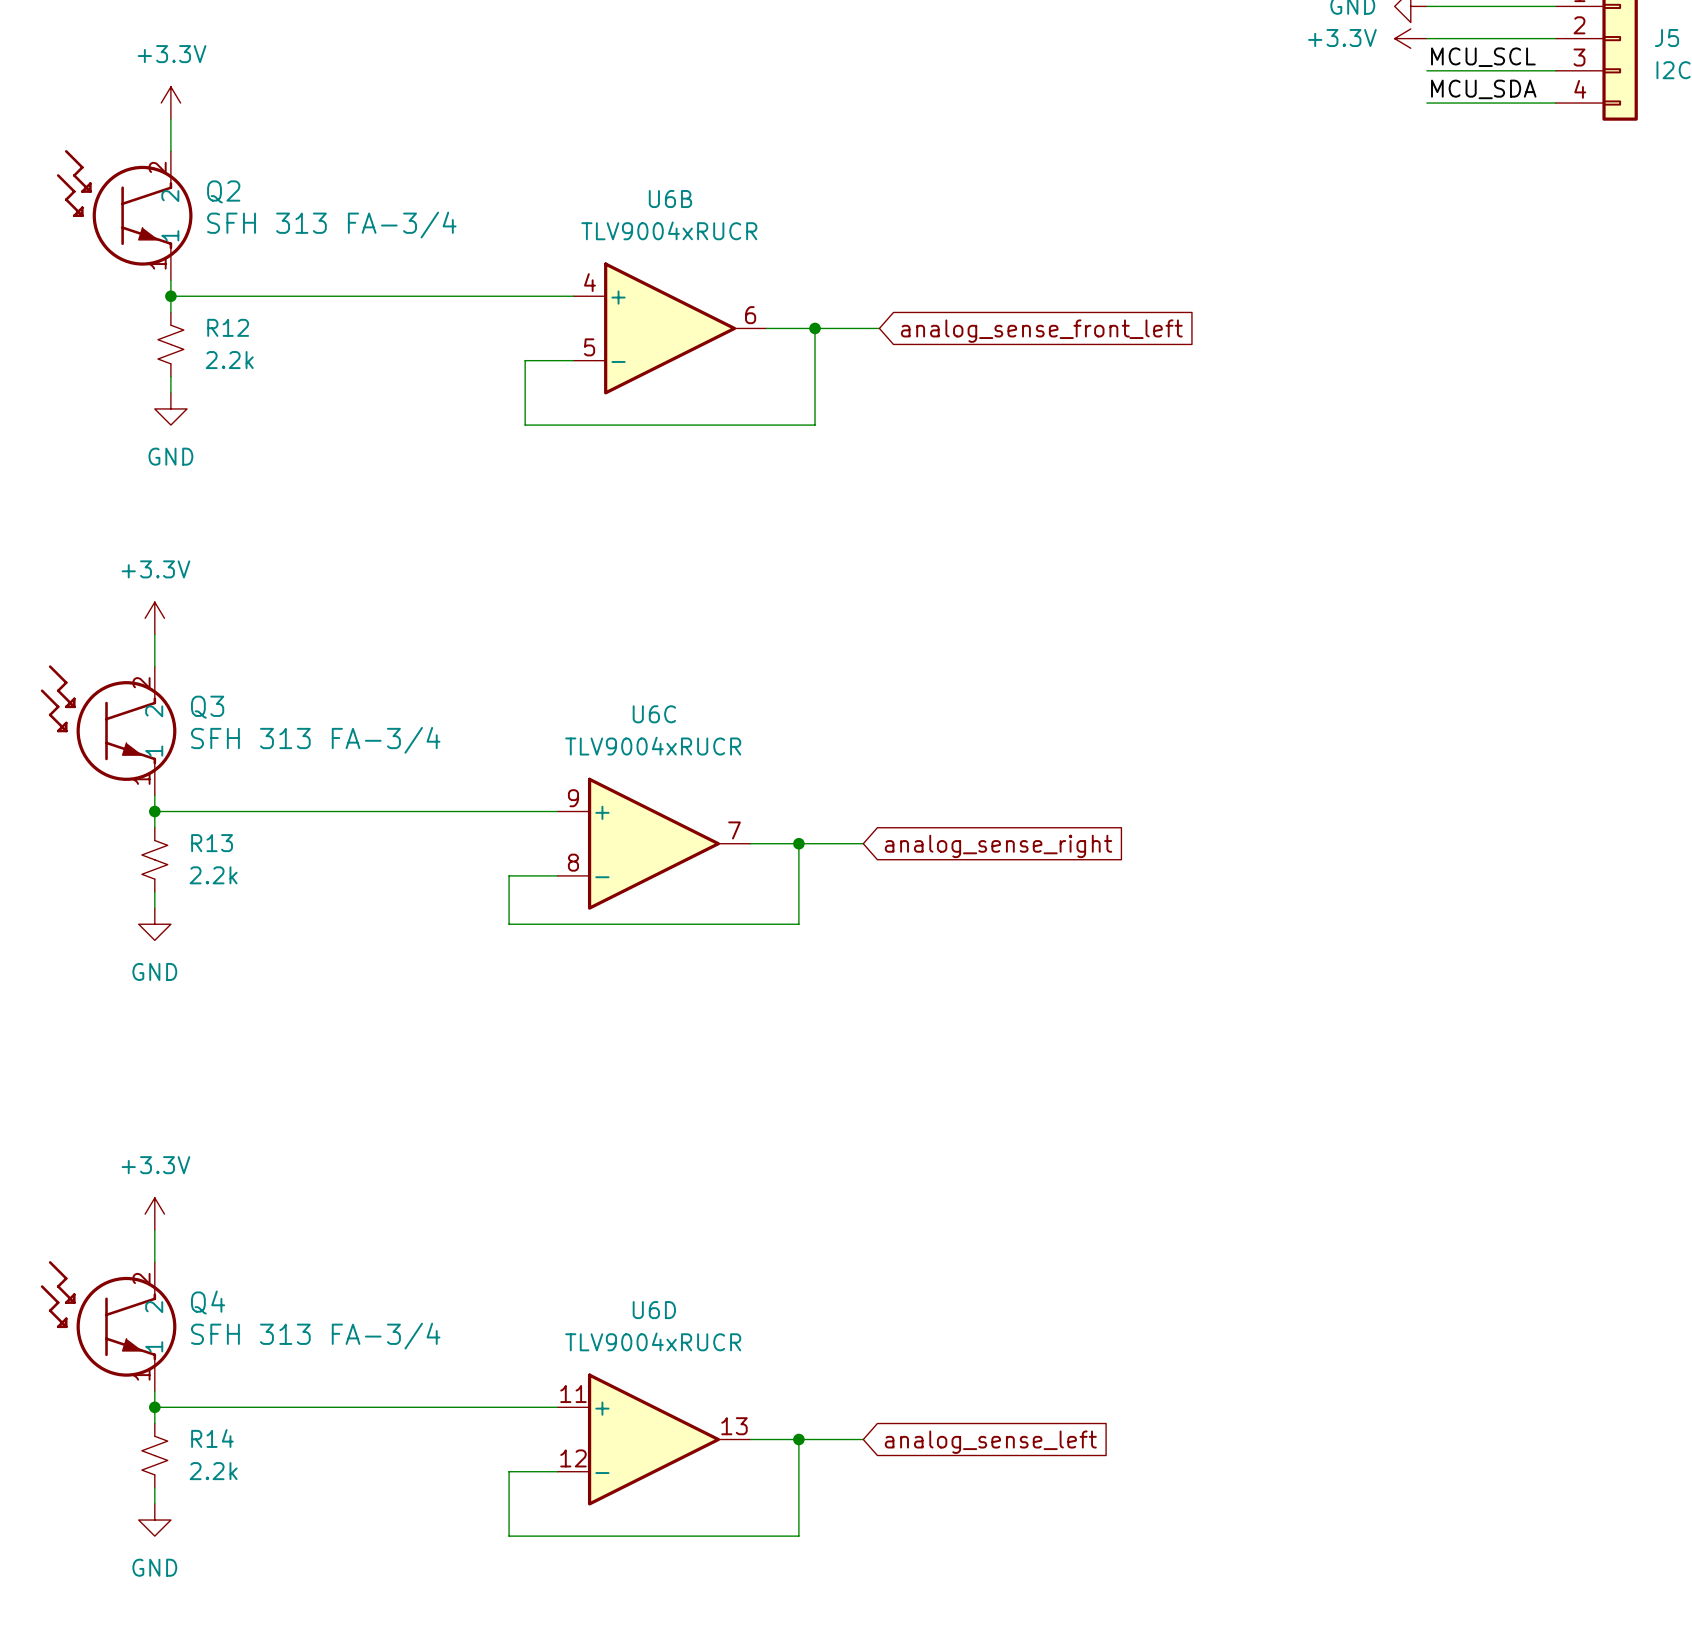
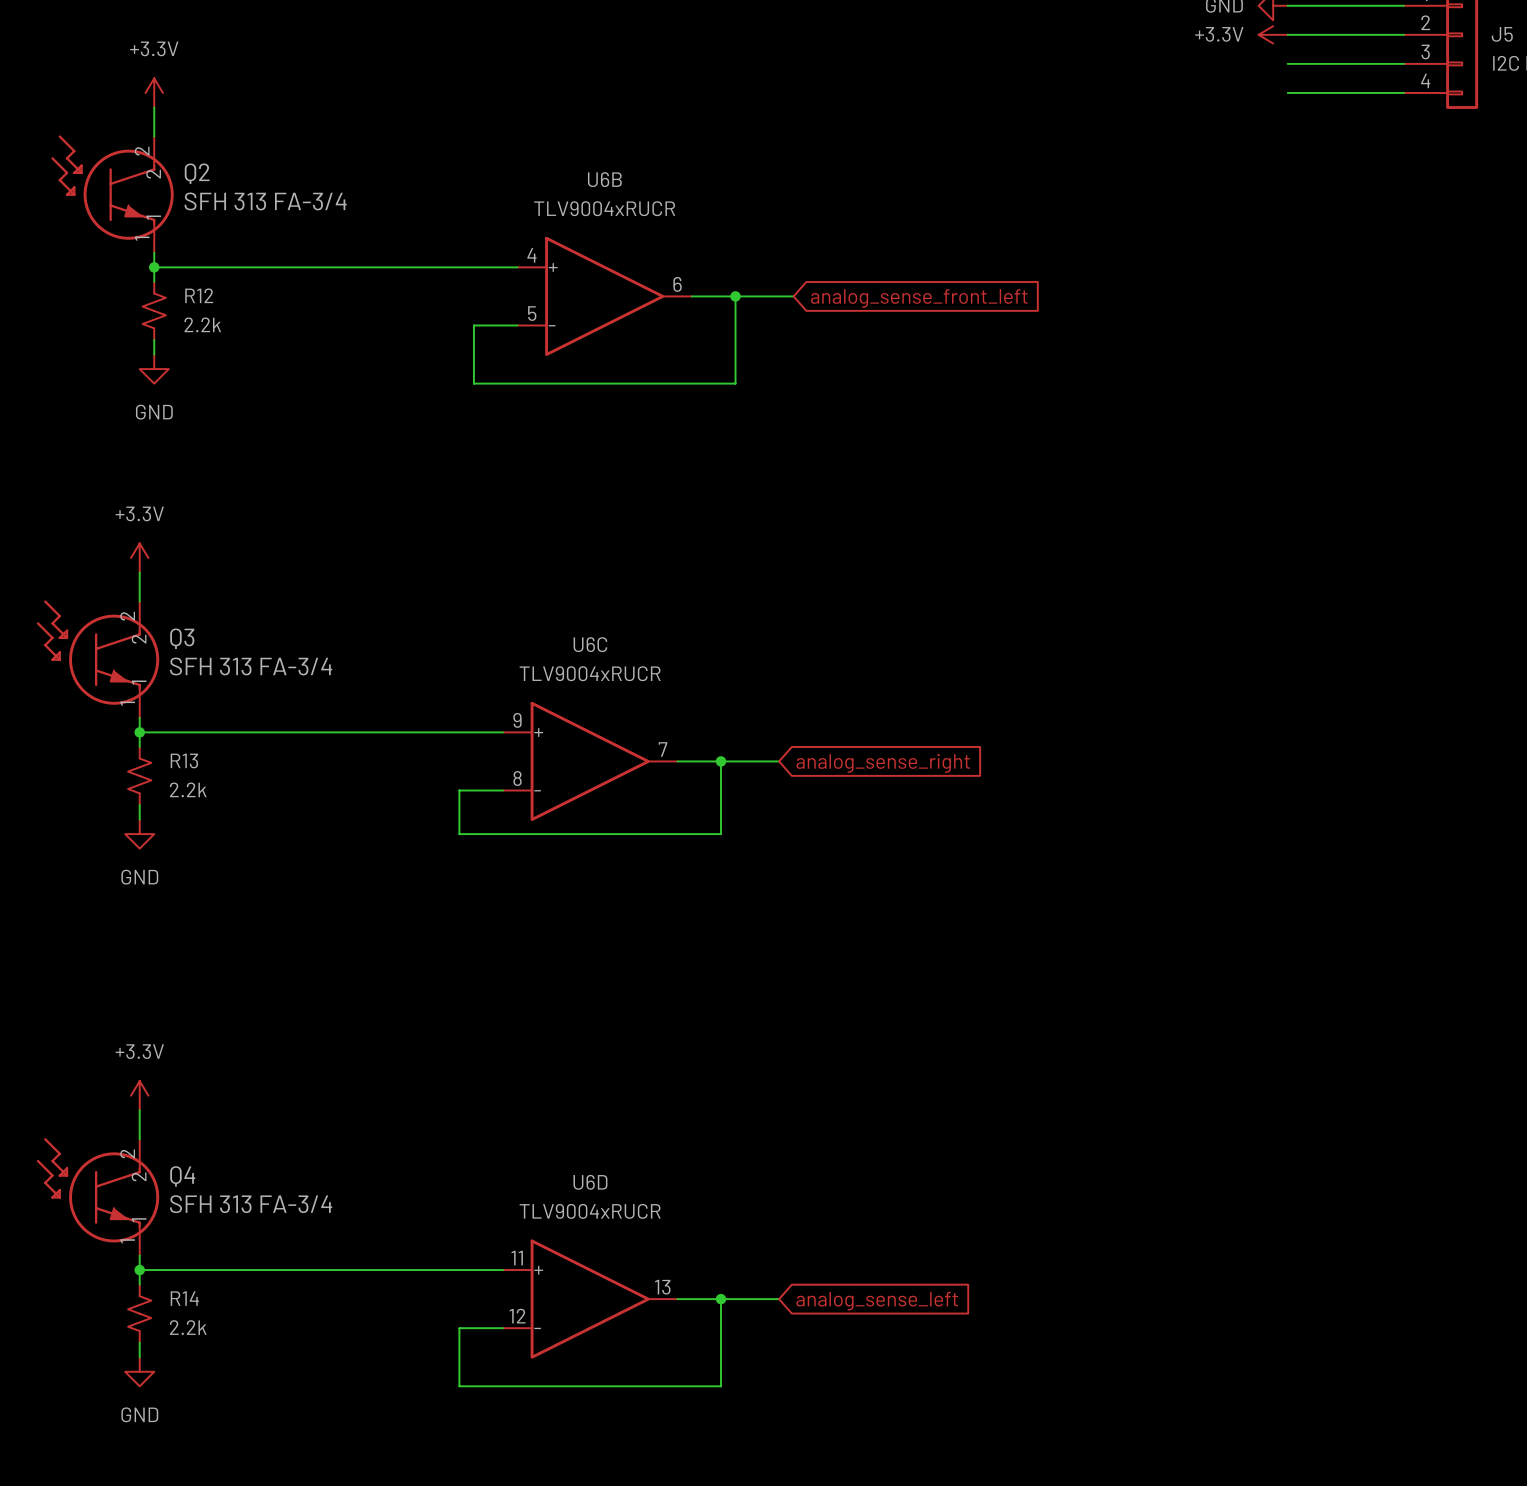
label: MCU_SCL (1483, 57) -> none
label: MCU_SDA (1483, 89) -> none

